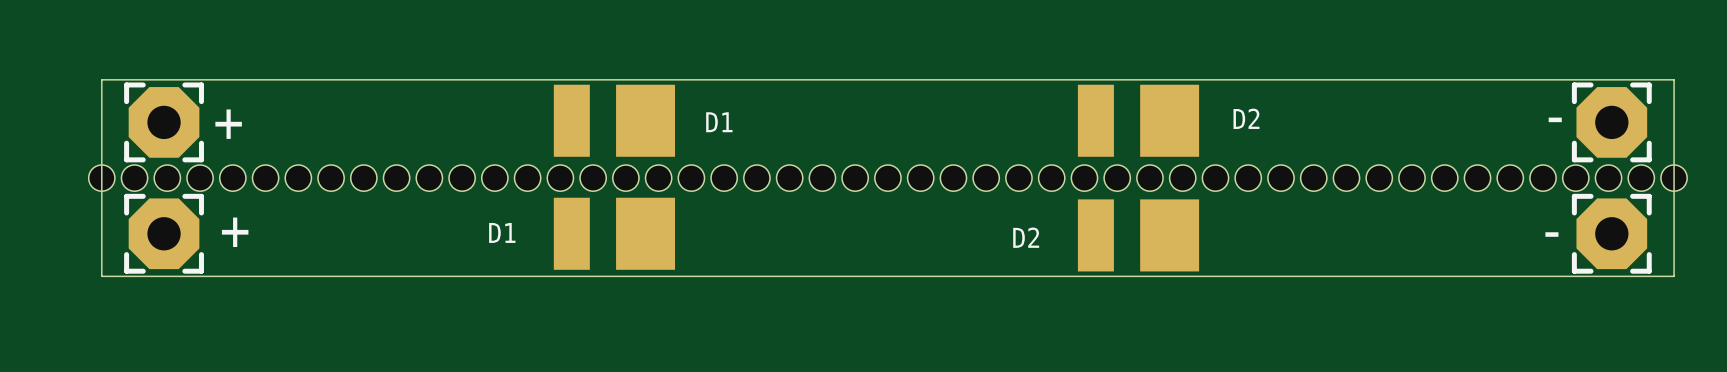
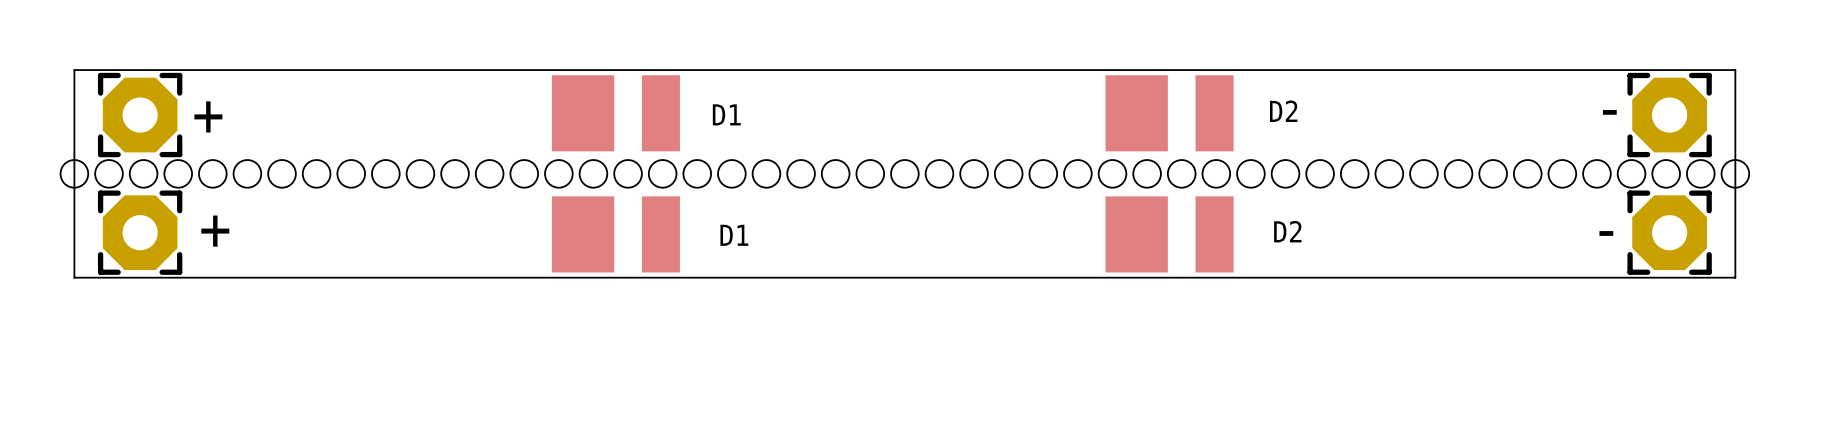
part rotation: 0° (614, 120) -> 180° (615, 113)
part rotation: 0° (1138, 120) -> 180° (1169, 113)
D1 rotation: 0° (614, 233) -> 180° (615, 234)
D2 rotation: 0° (1138, 235) -> 180° (1169, 234)

